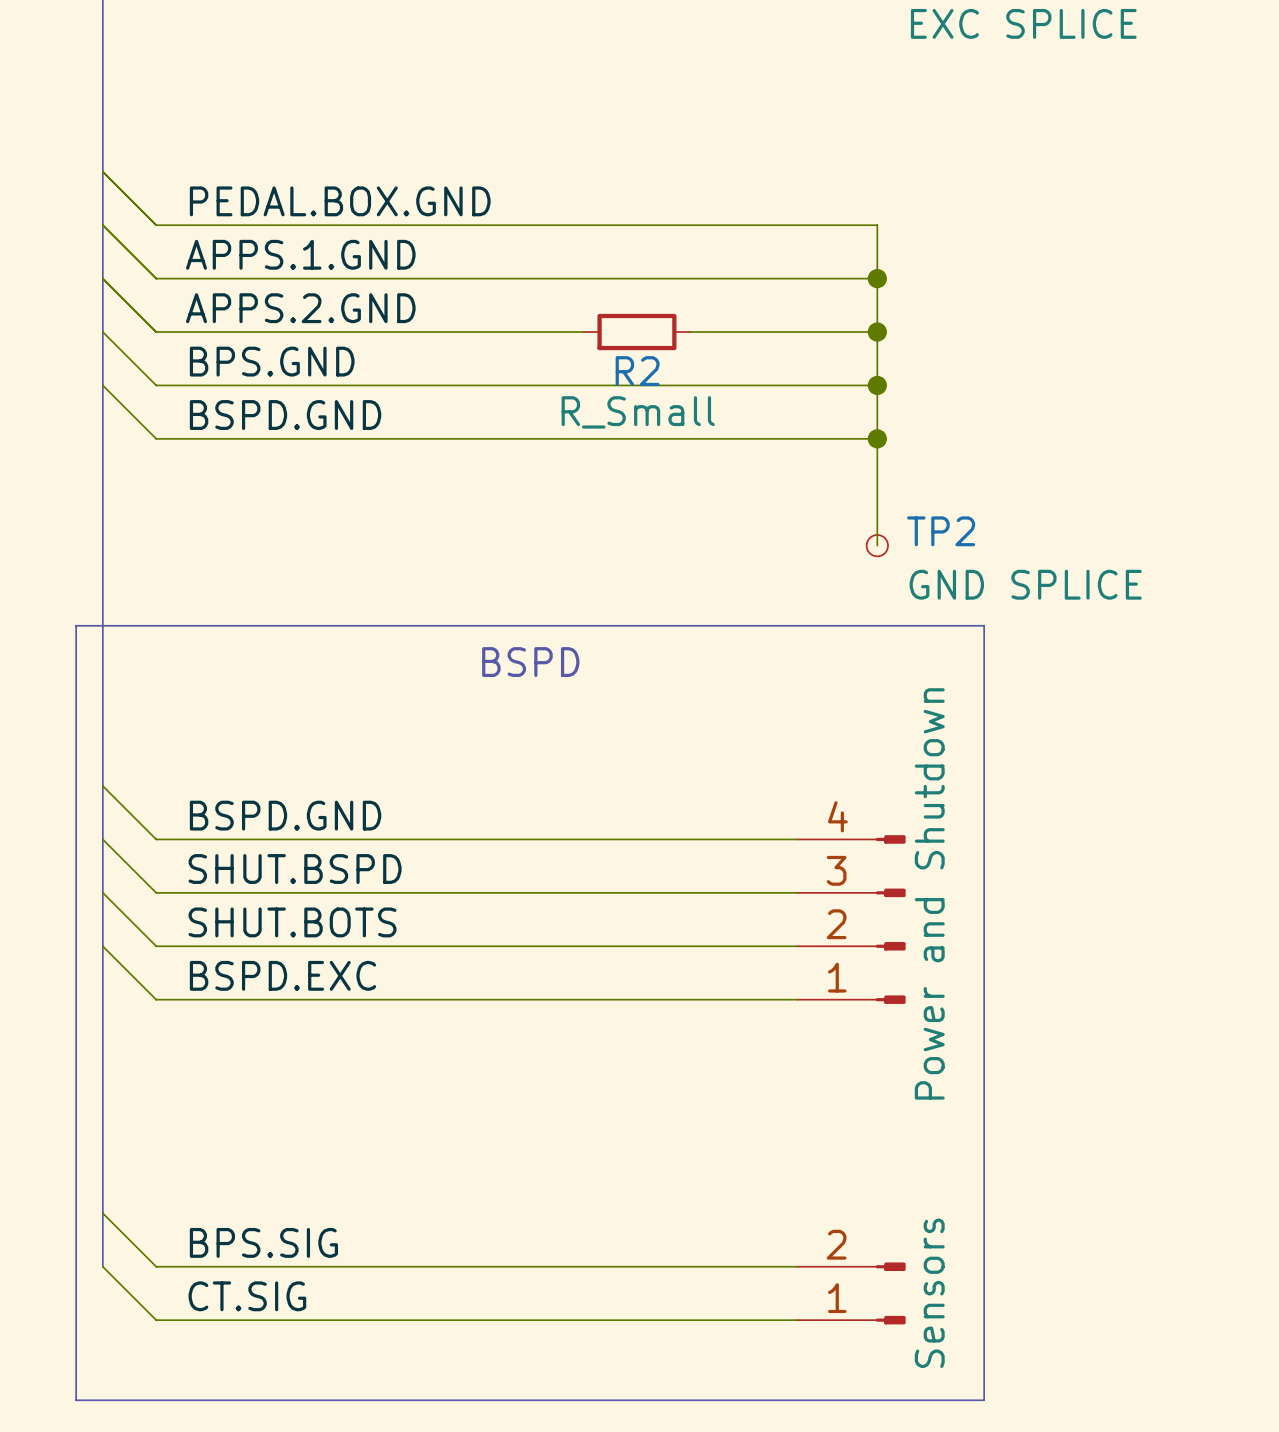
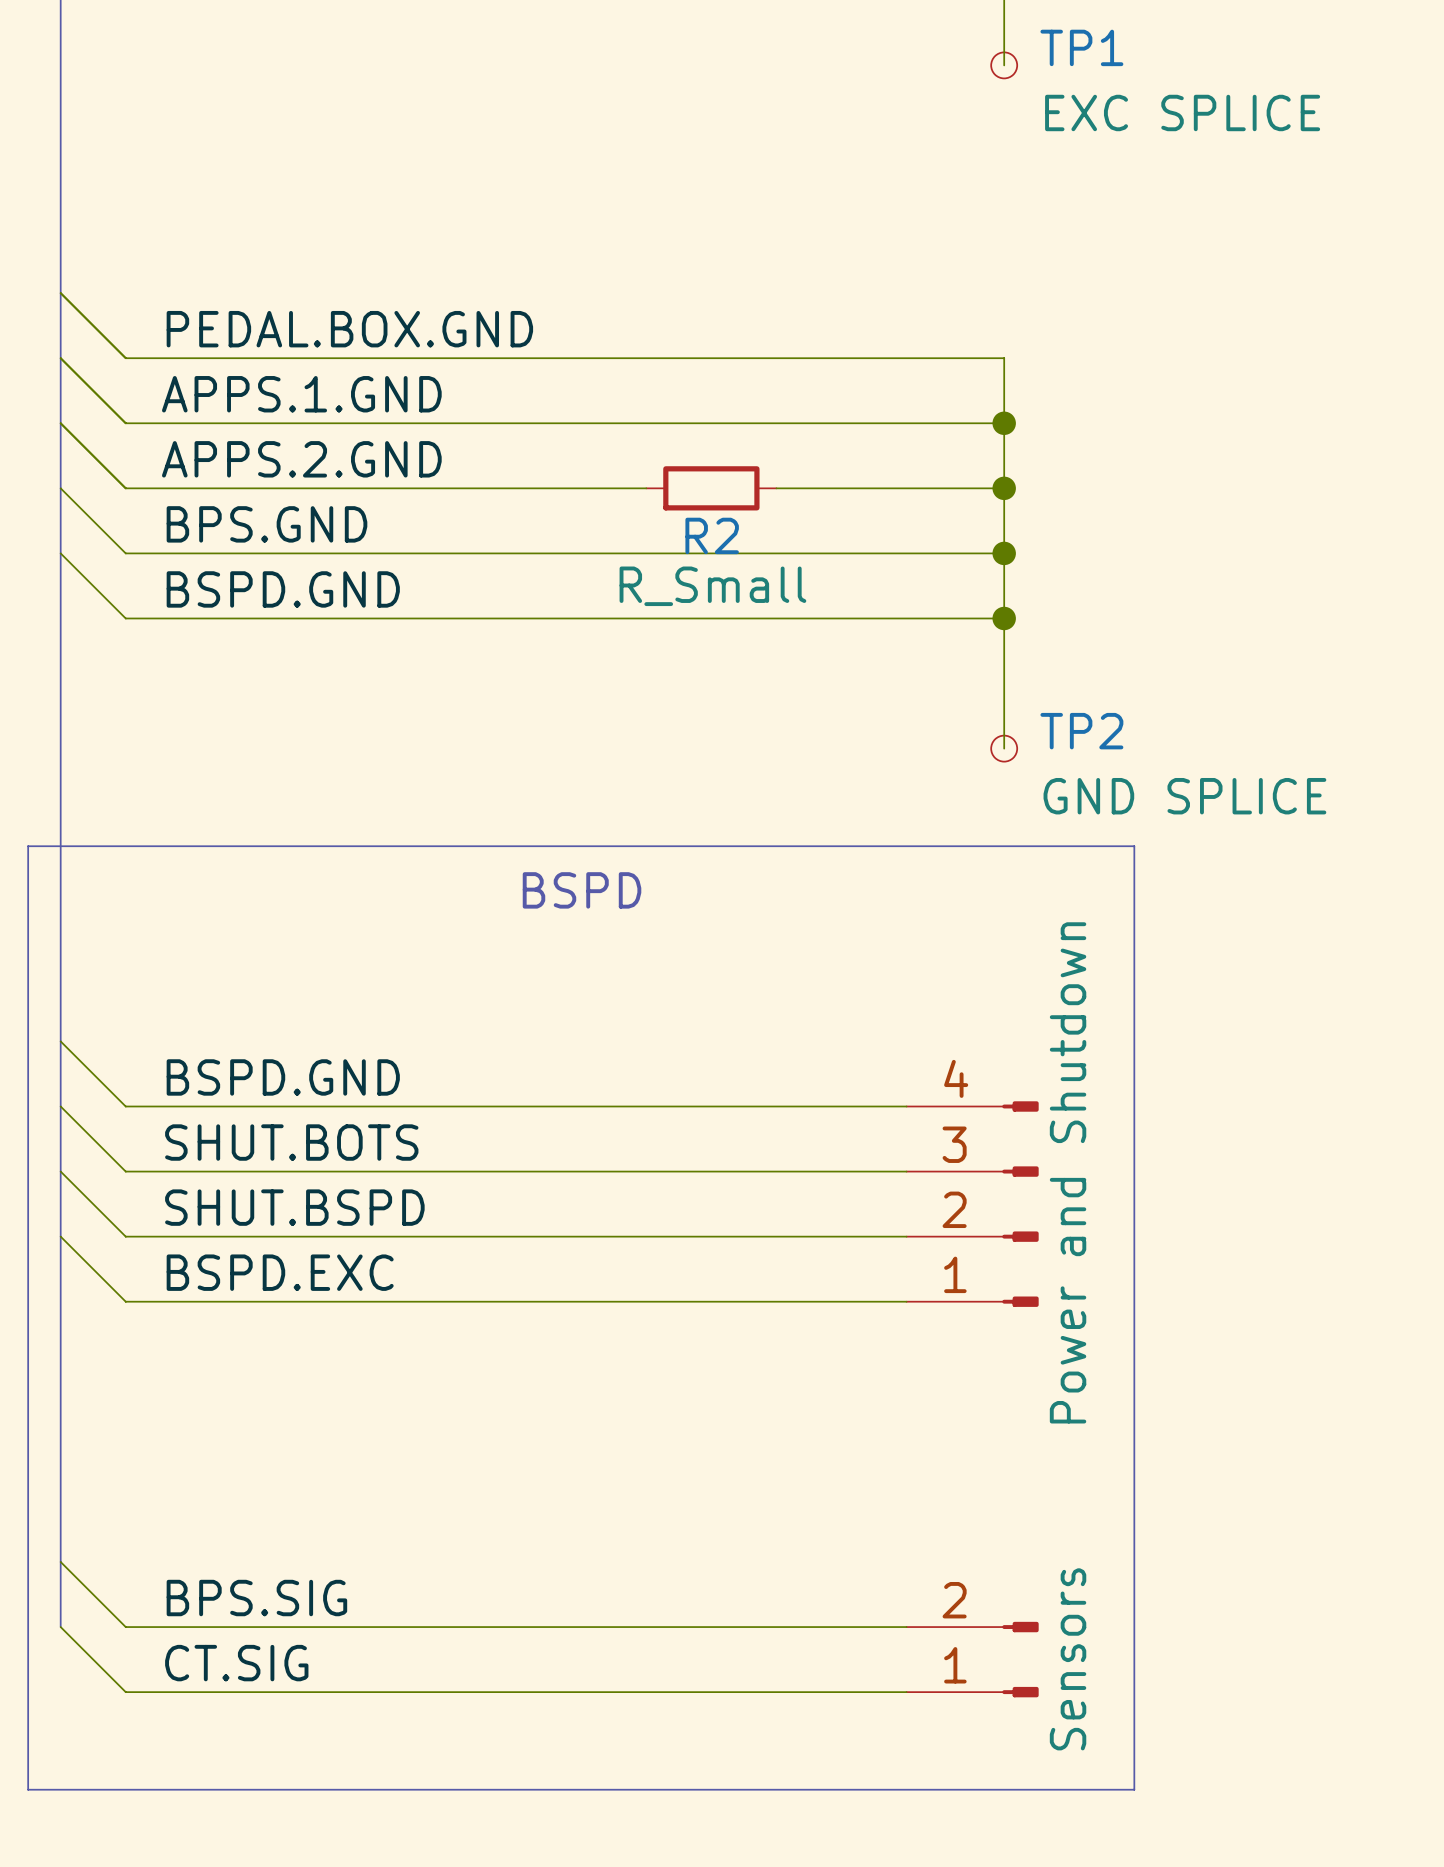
label: SHUT.BSPD (295, 869) -> SHUT.BOTS (291, 1142)
label: SHUT.BOTS (292, 922) -> SHUT.BSPD (294, 1207)

